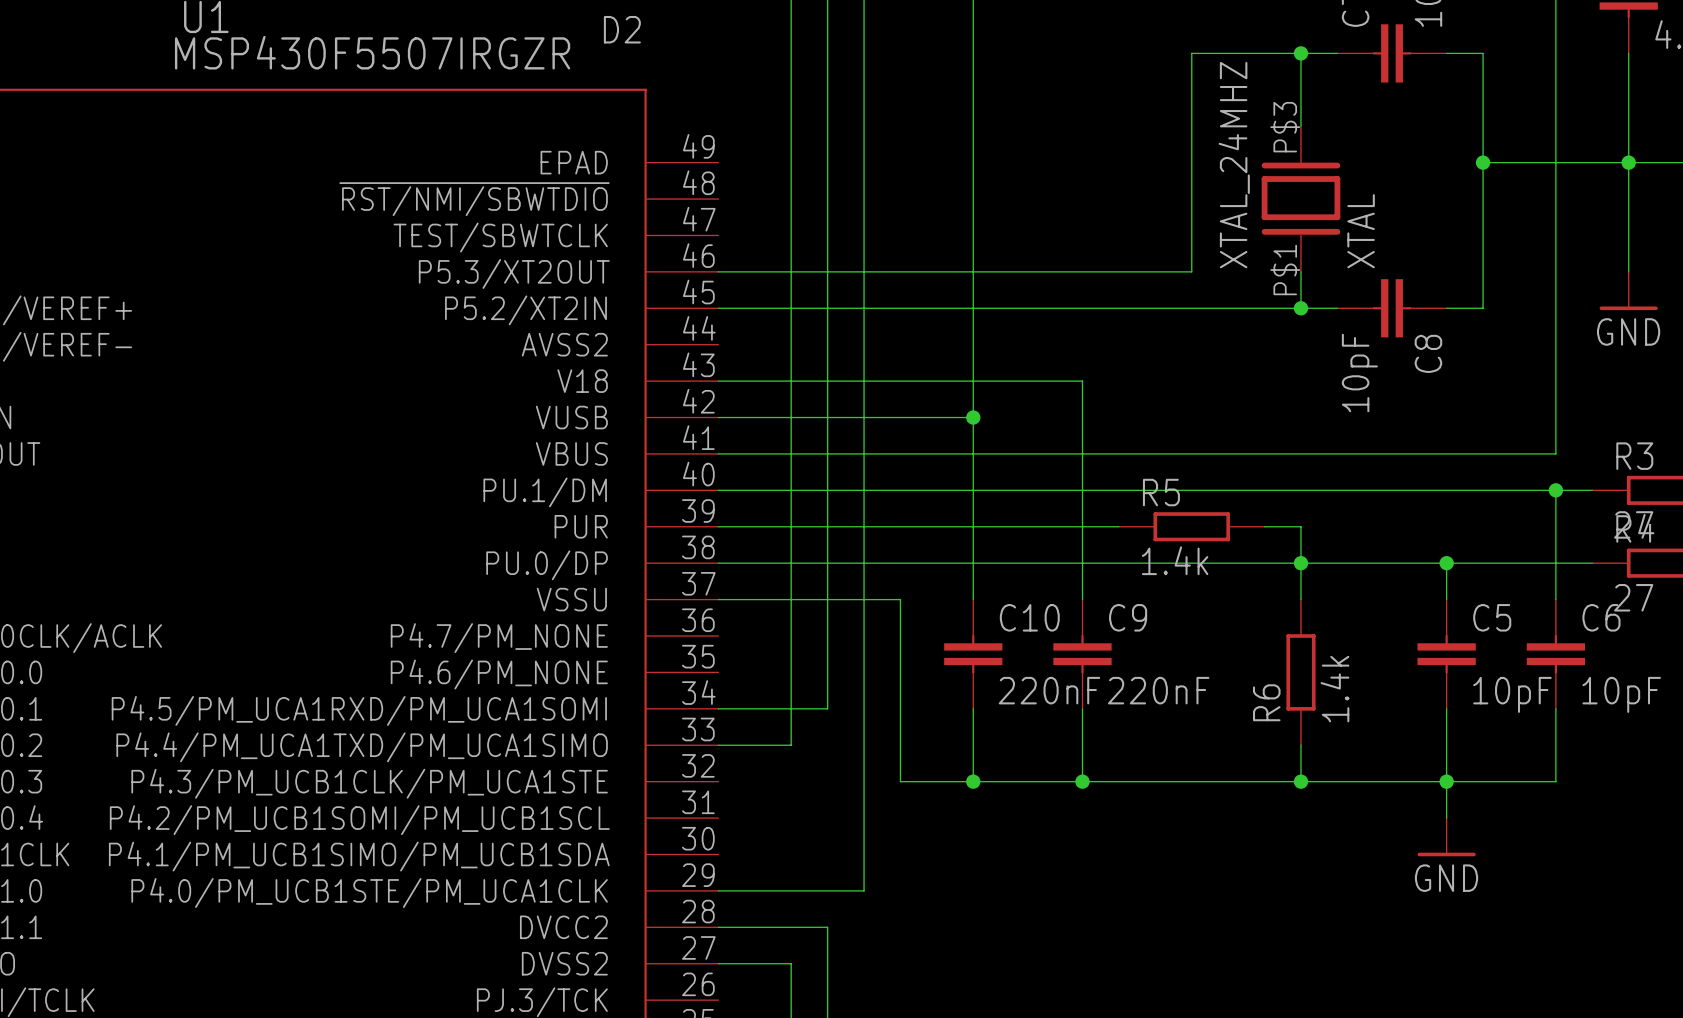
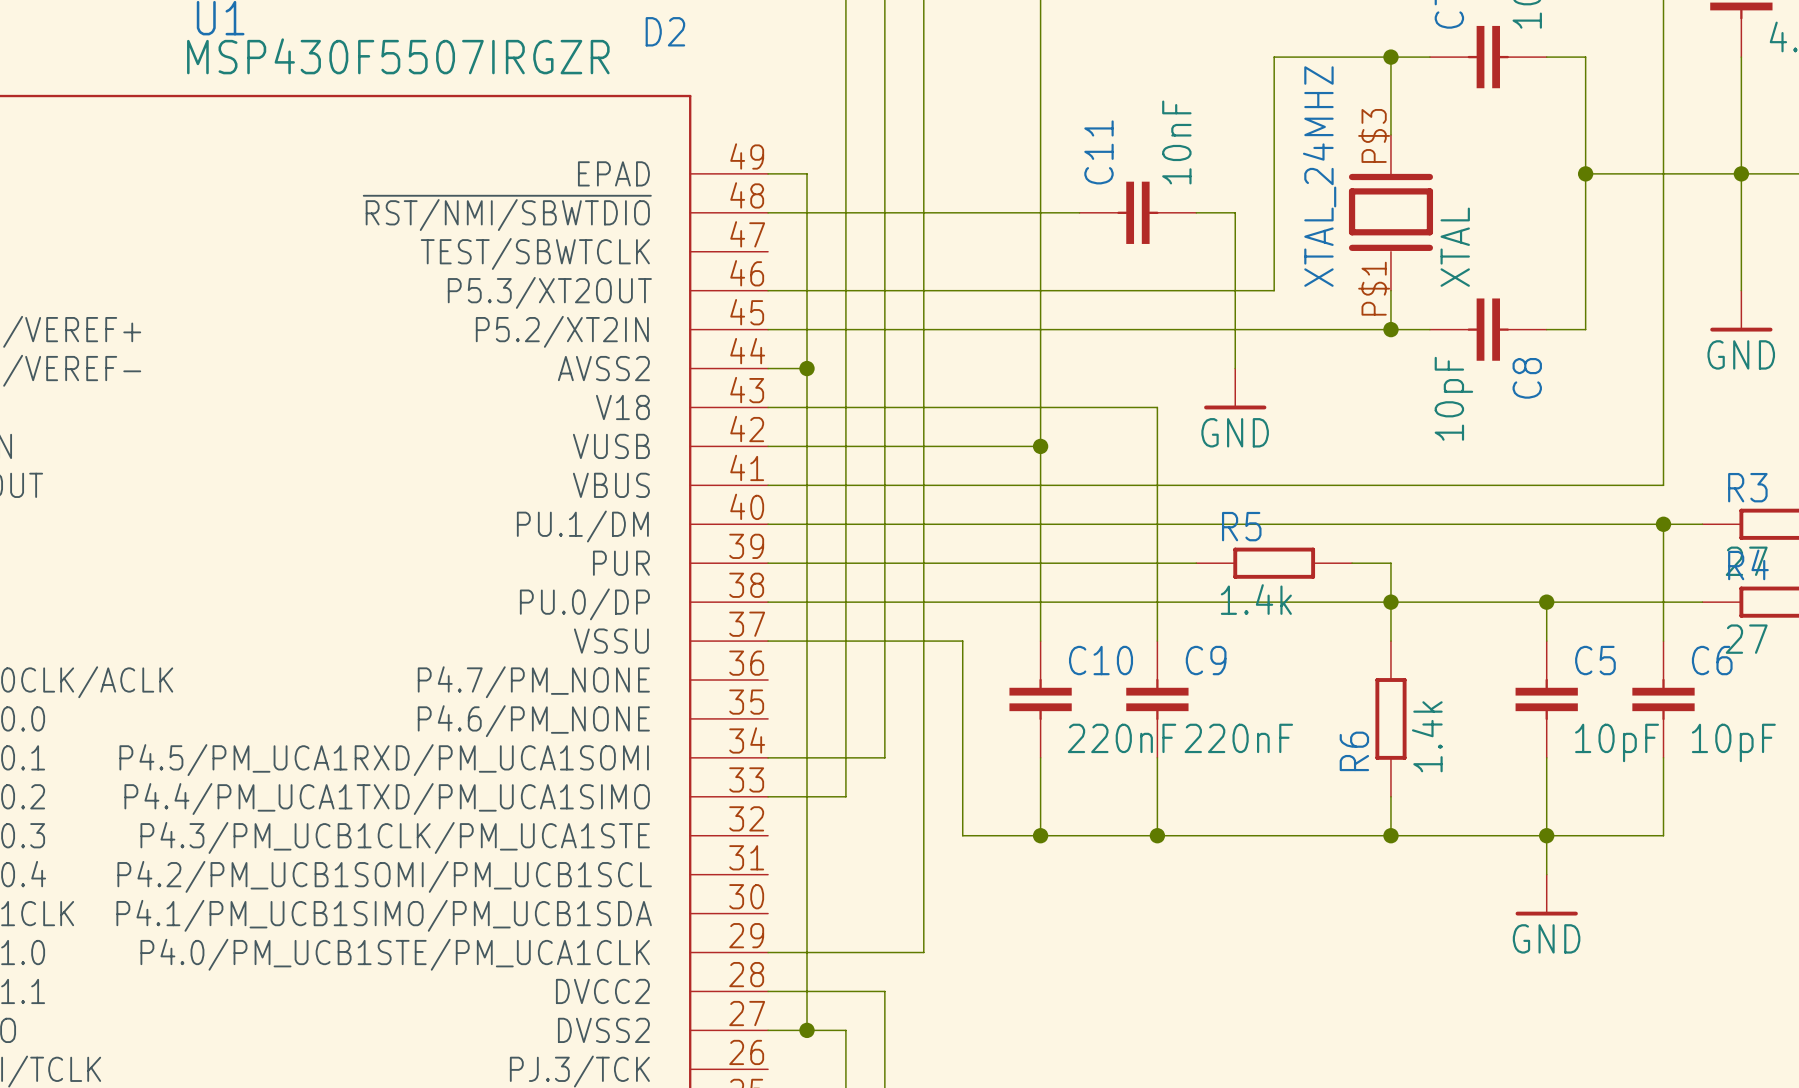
wire: none -> (768, 173) (807, 173) (807, 1030)
wire: none -> (768, 212) (1079, 212)
C11: none -> 10nF (1137, 212)
wire: none -> (1196, 212) (1235, 212) (1235, 368)
wire: none -> (768, 368) (807, 368)
junction: none -> (807, 368)
power symbol: none -> GND (1235, 388)
junction: none -> (807, 1030)

